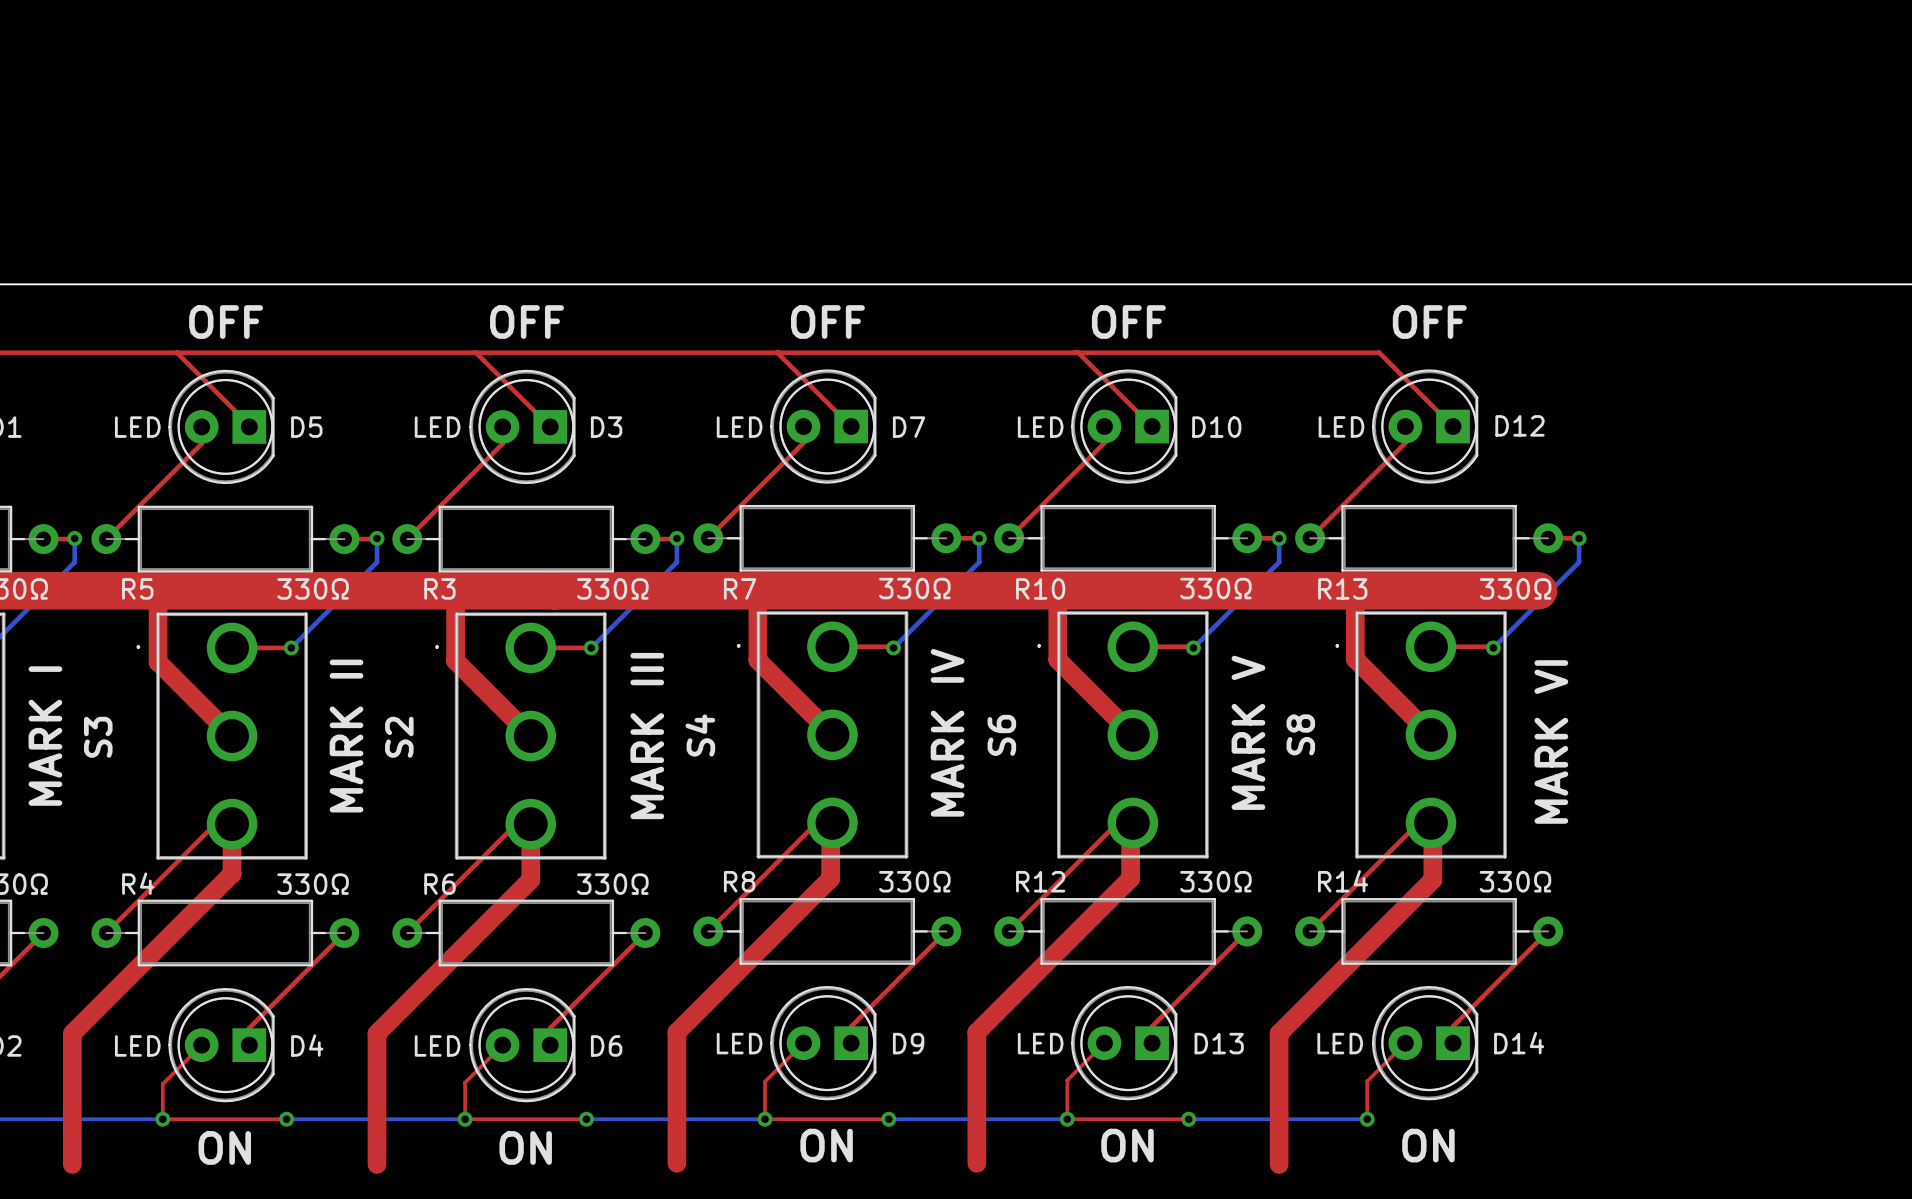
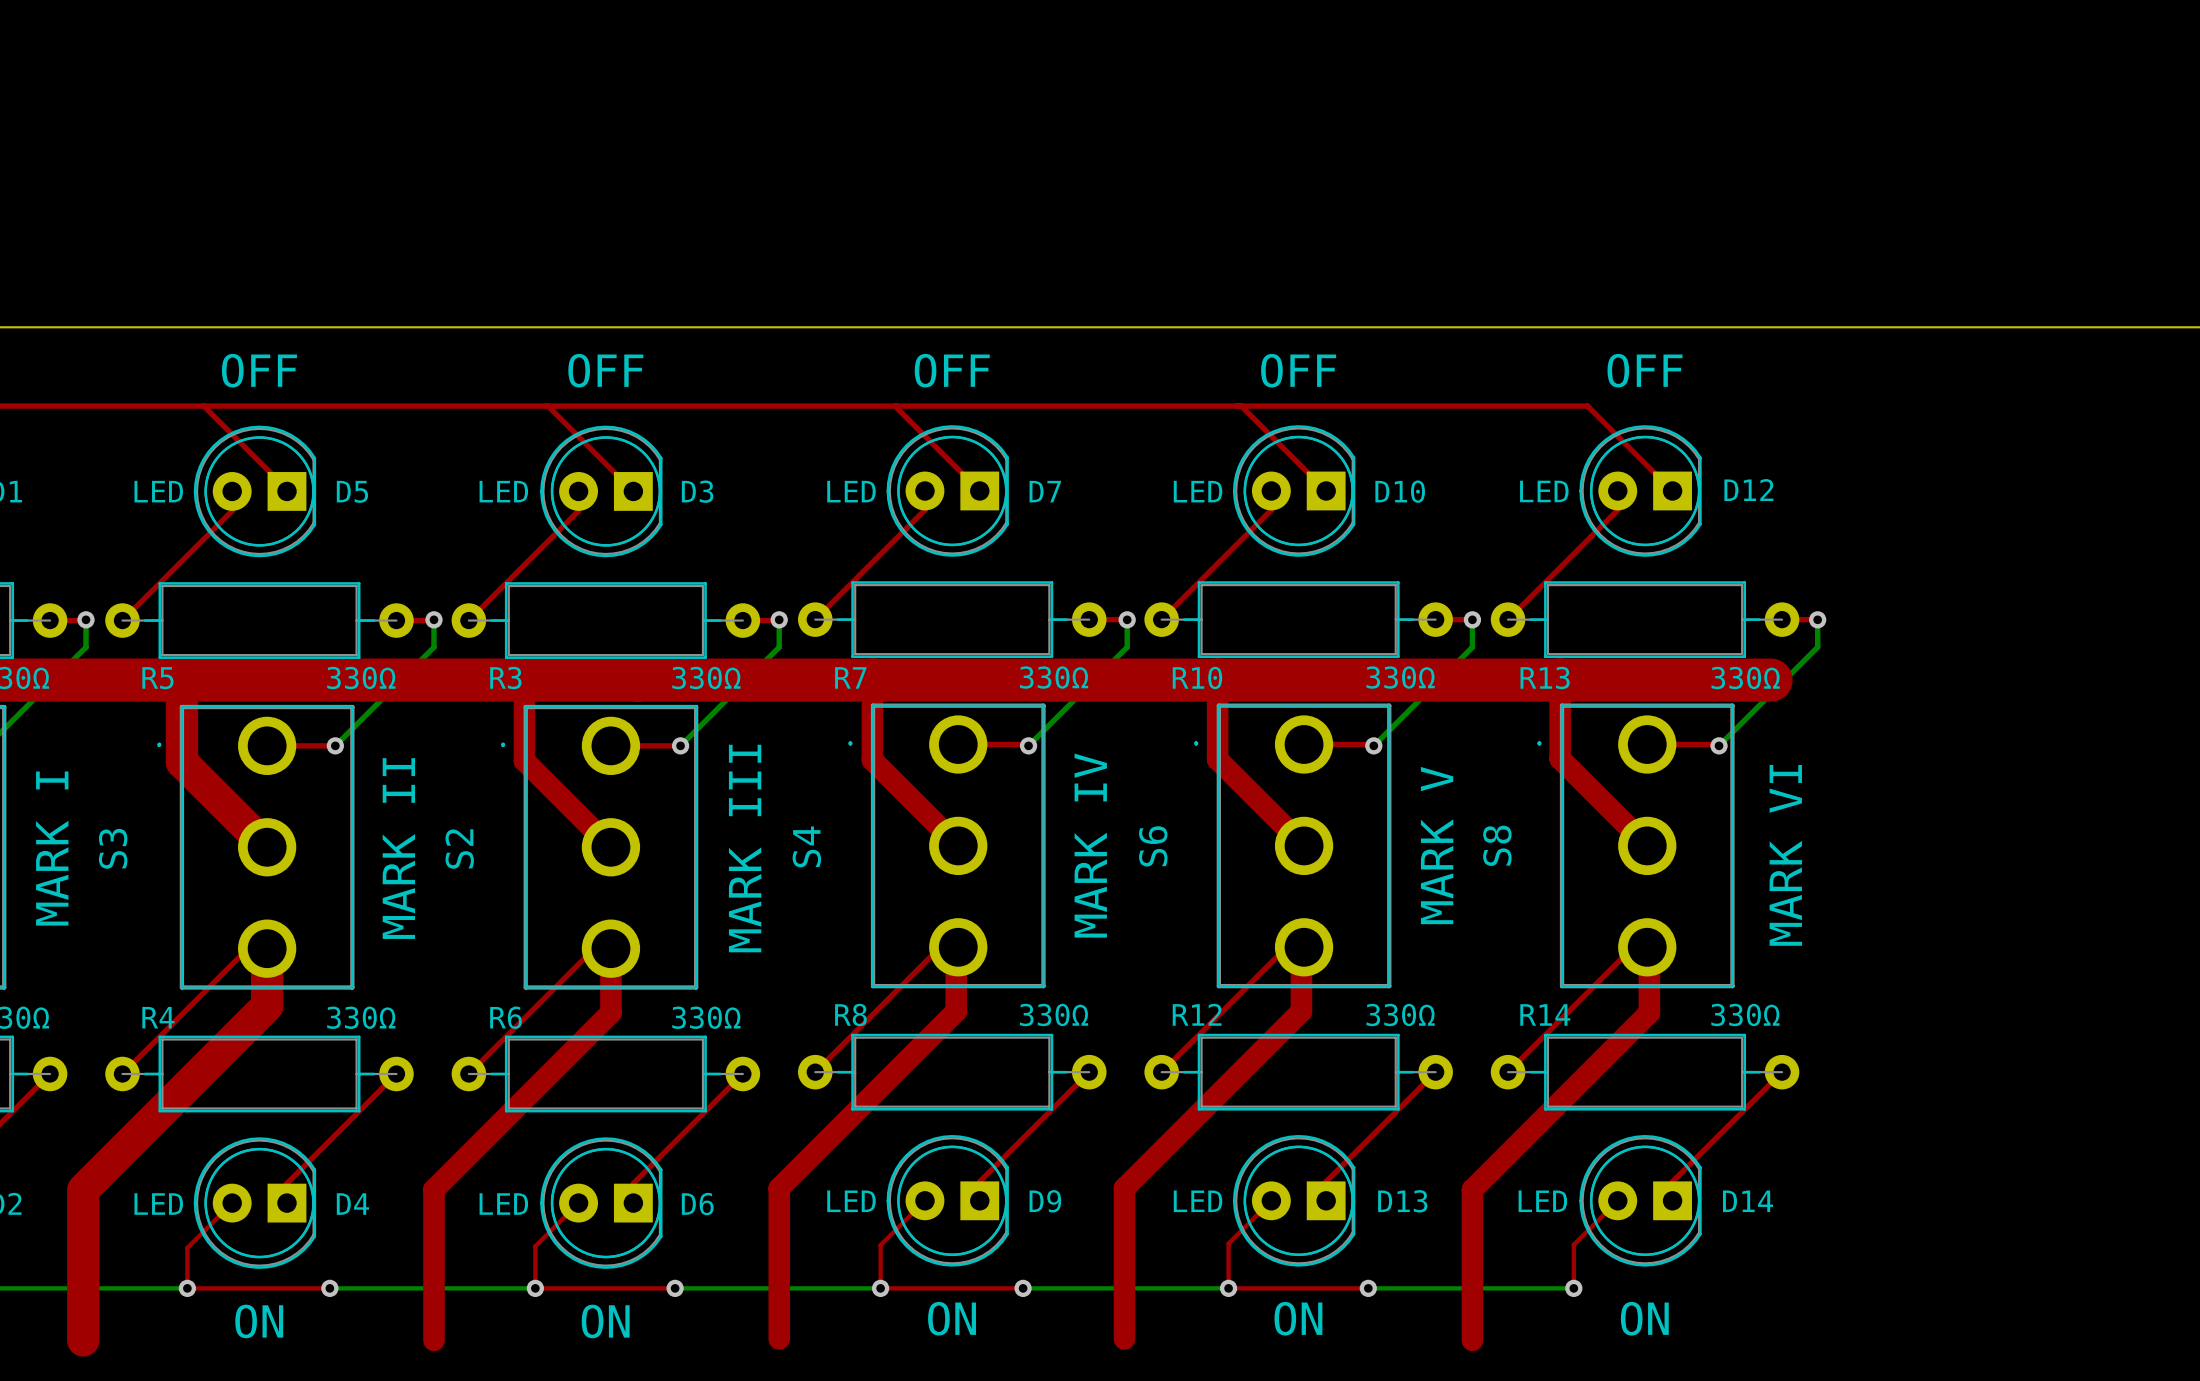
top track width: thin (158, 590) (158, 662) (232, 736) -> thick (181, 680) (181, 762) (267, 847)
top track width: thin (232, 824) (232, 873) (74, 1031) -> thick (267, 948) (267, 1005) (86, 1187)
top track width: thin (72, 1033) (72, 1164) -> thick (83, 1189) (83, 1340)

